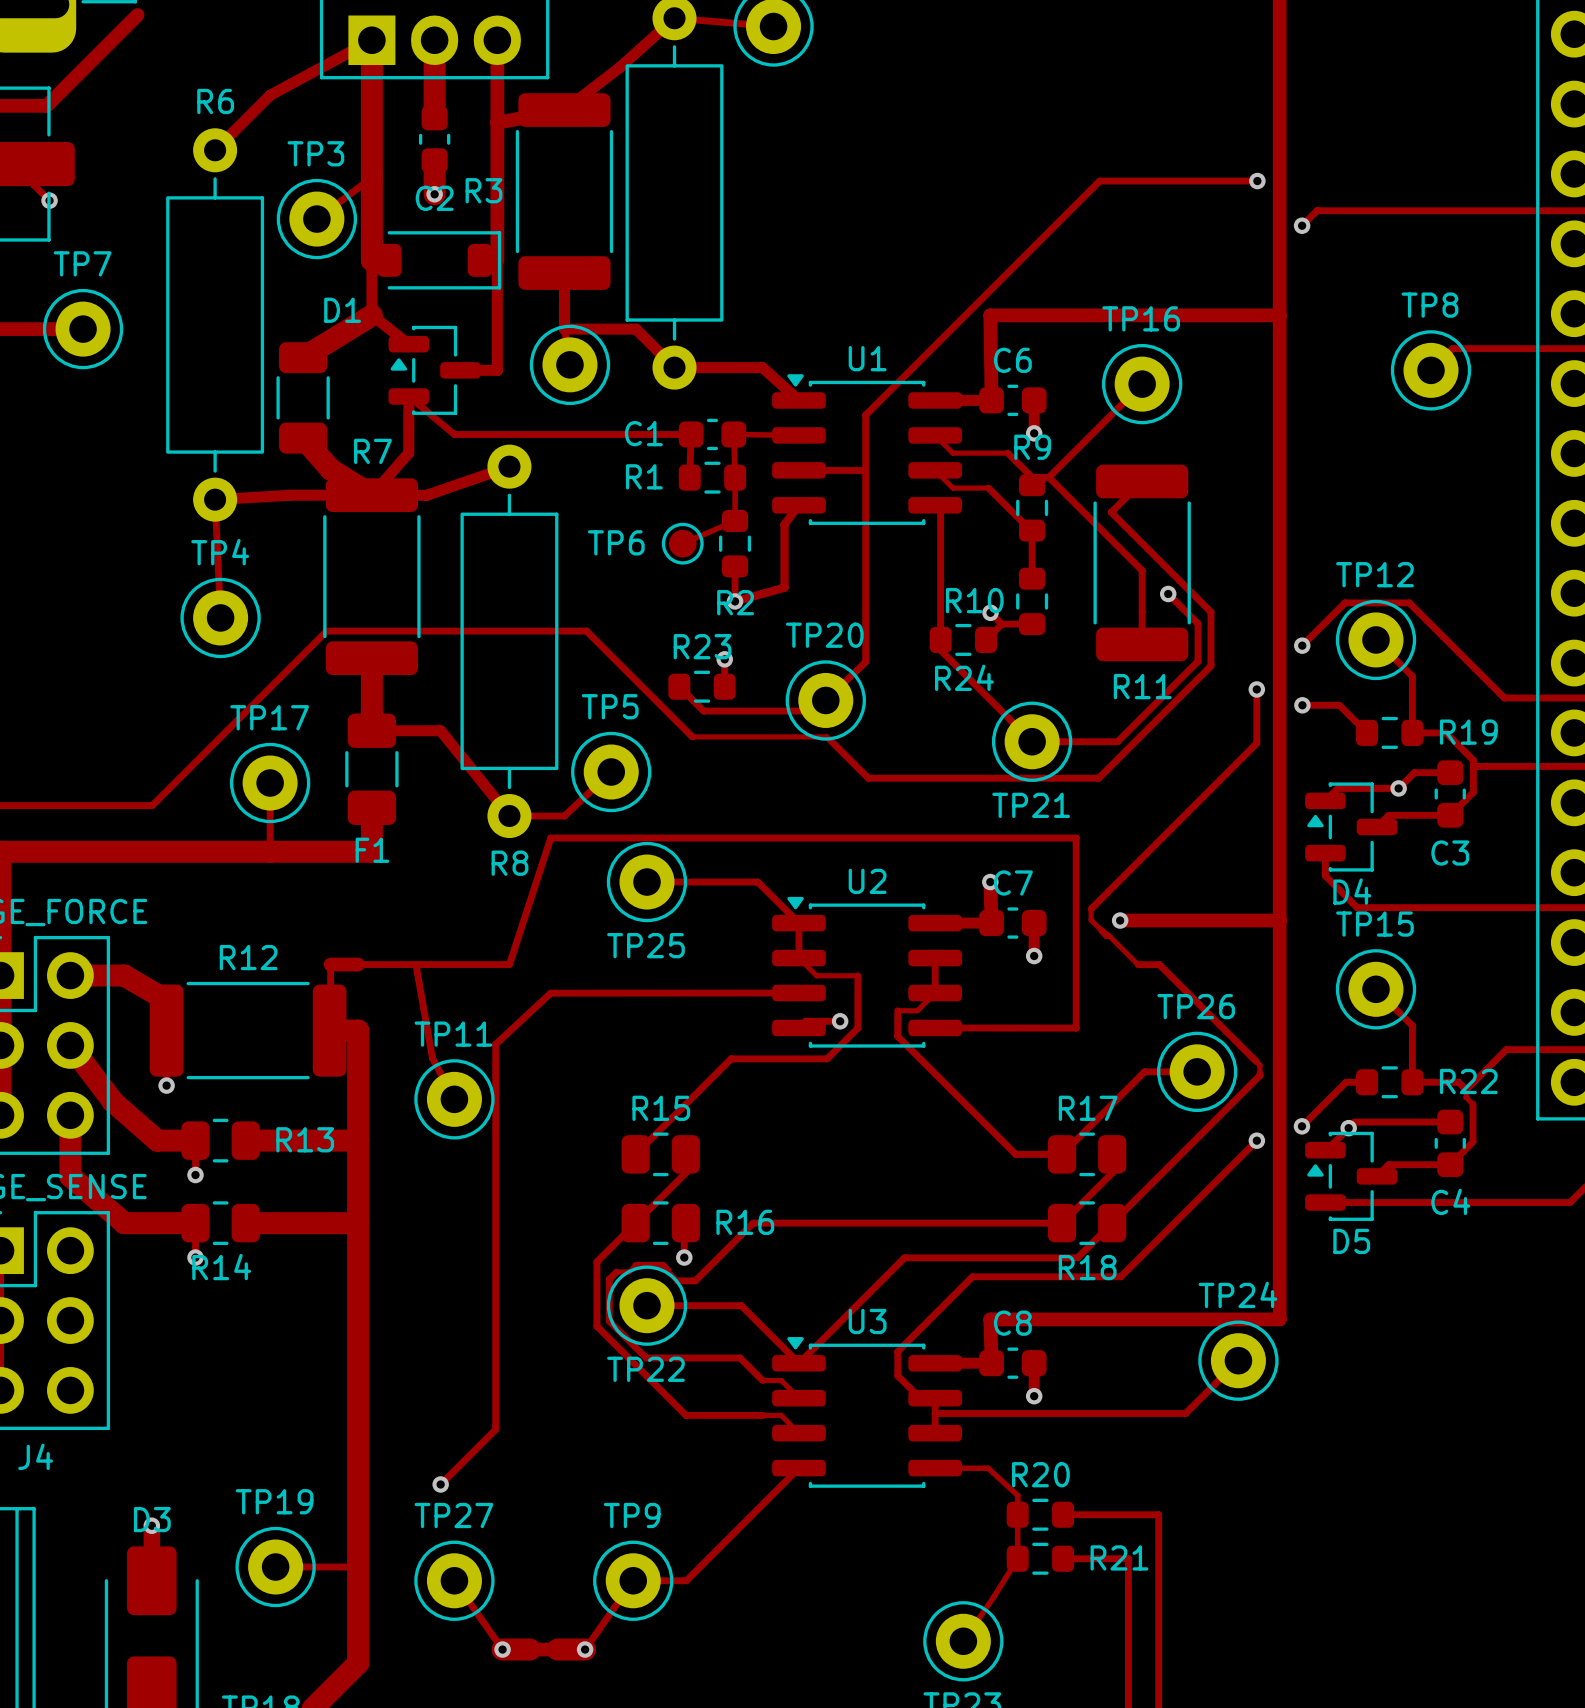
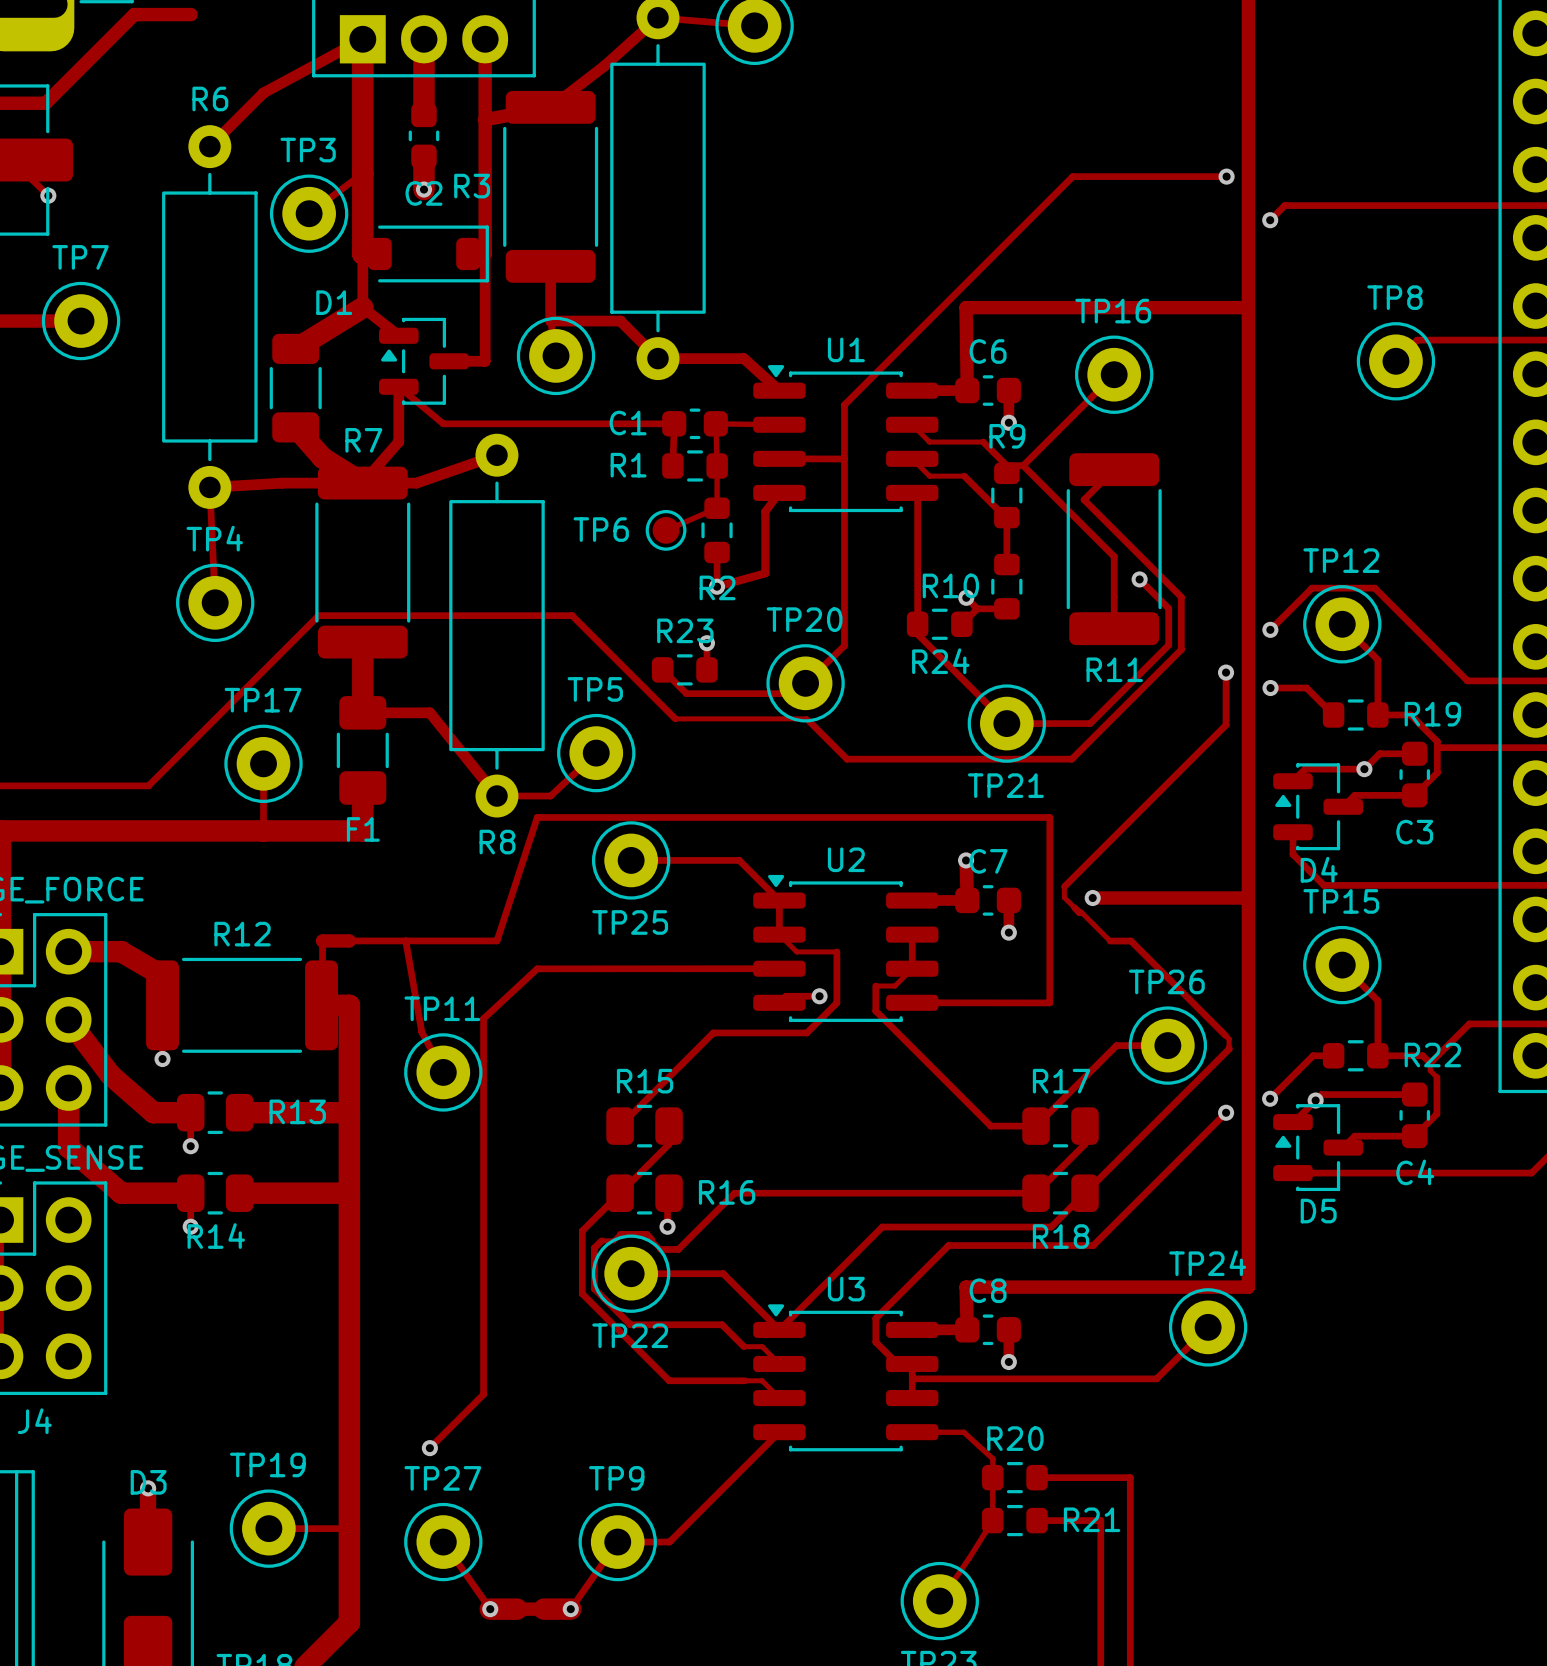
track: none -> (134, 14) (191, 14)

